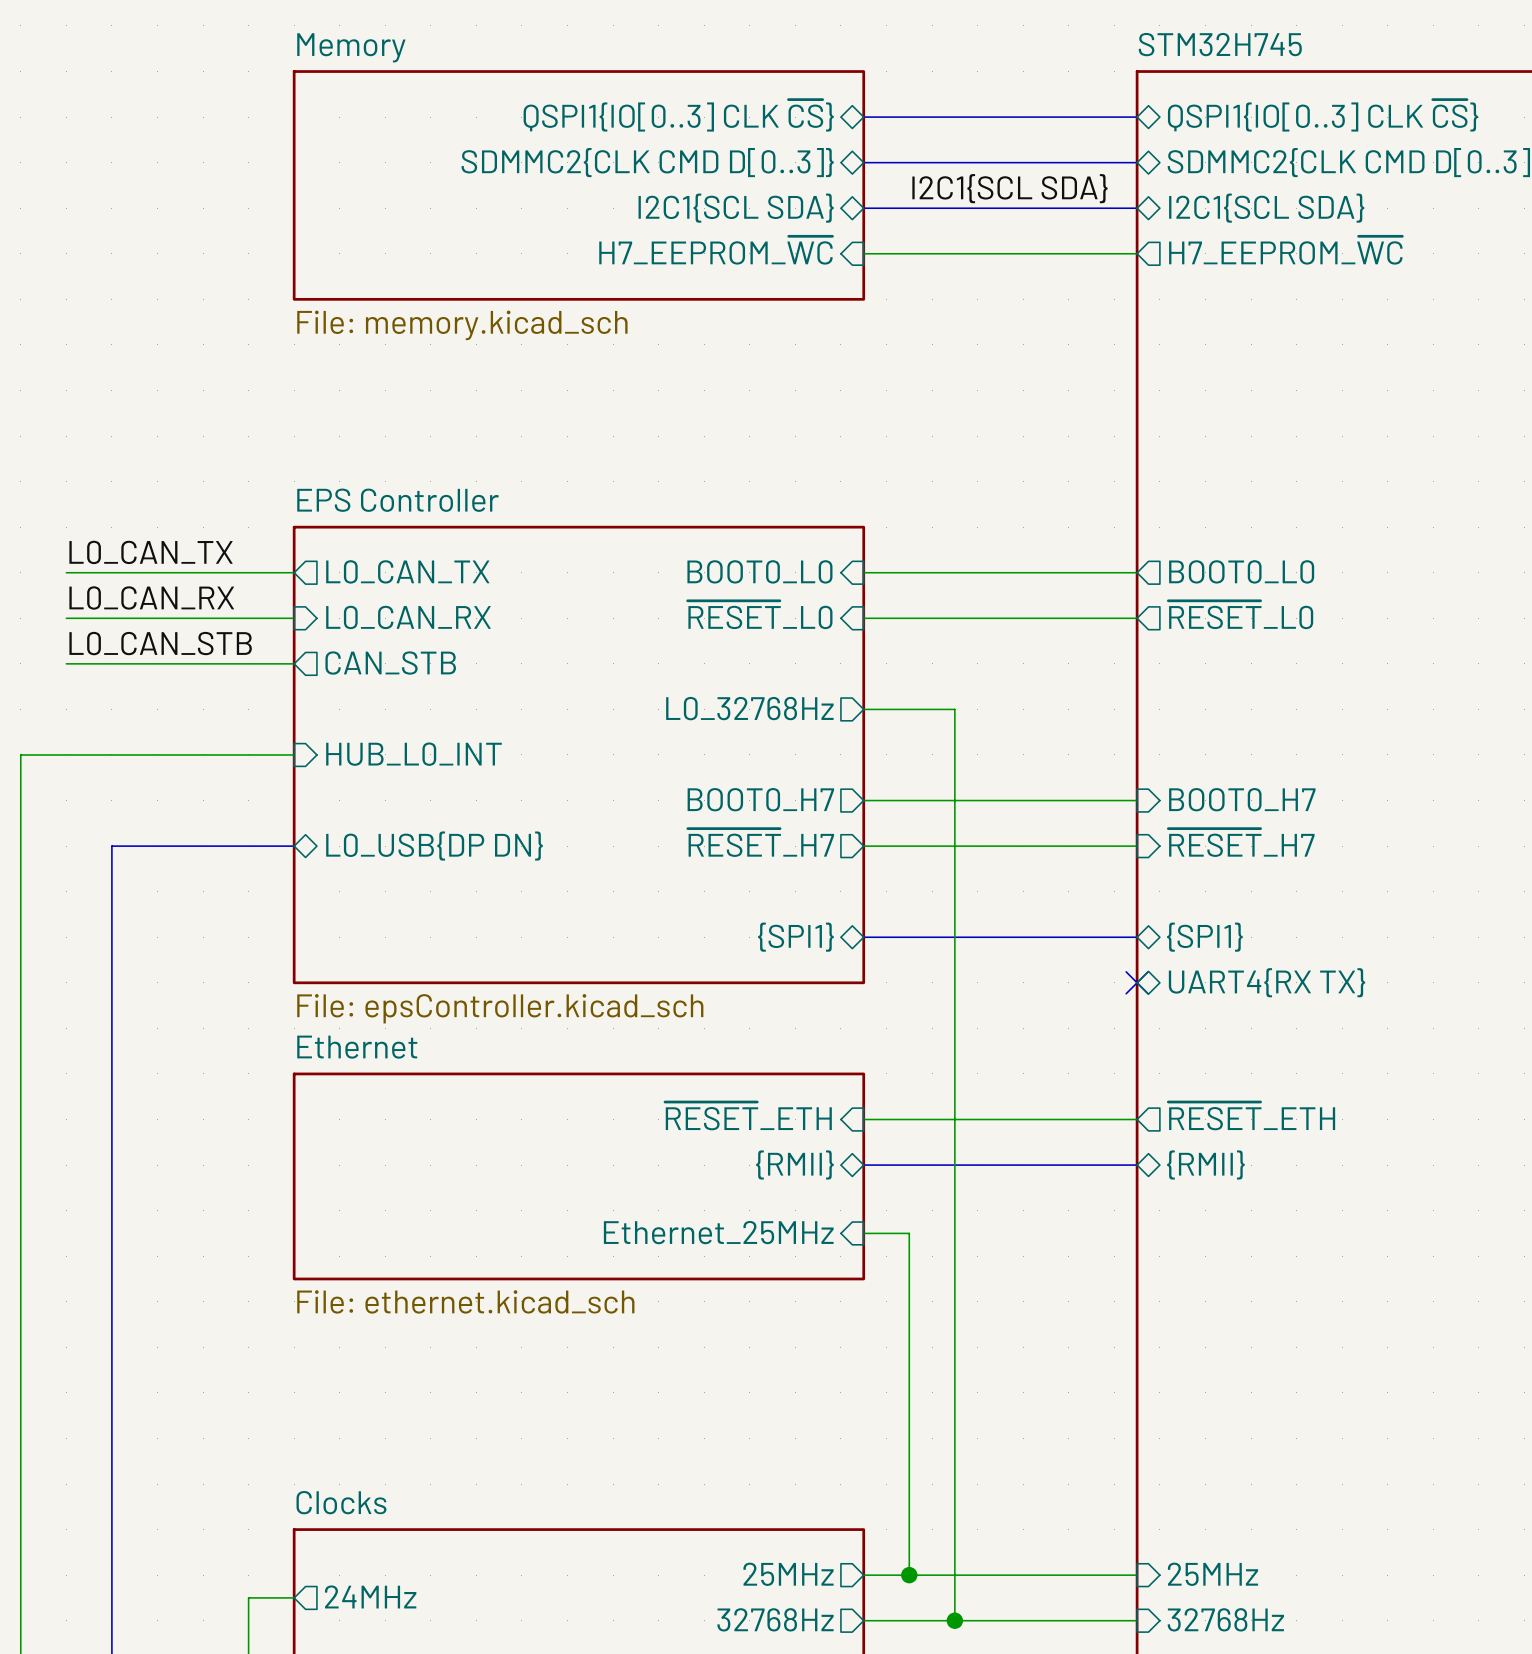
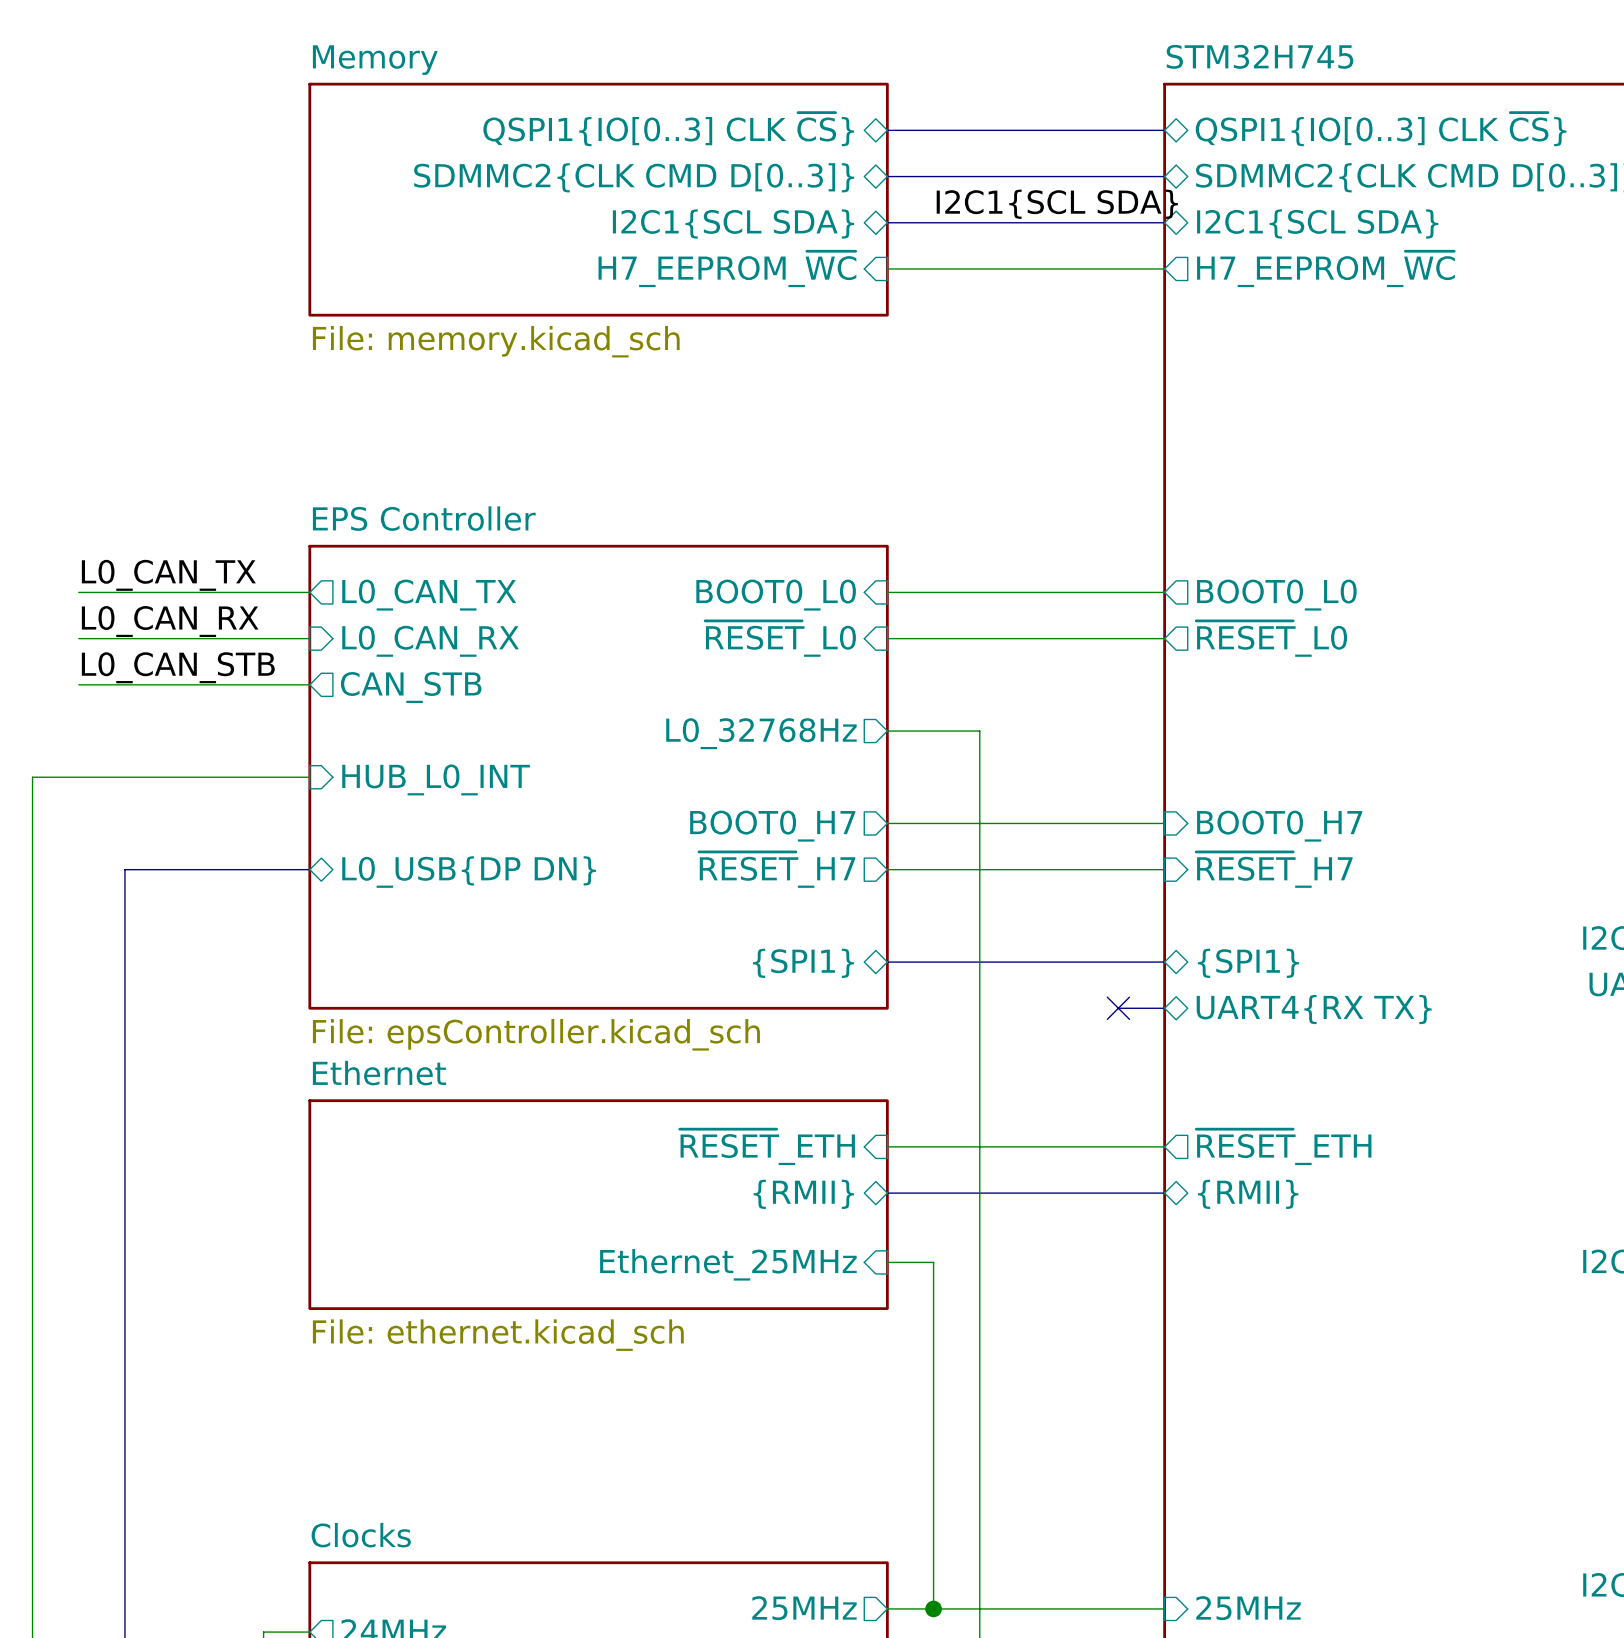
bus: none -> (1118, 1008) (1164, 1008)
no-connect mark position: (1137, 982) -> (1118, 1008)

